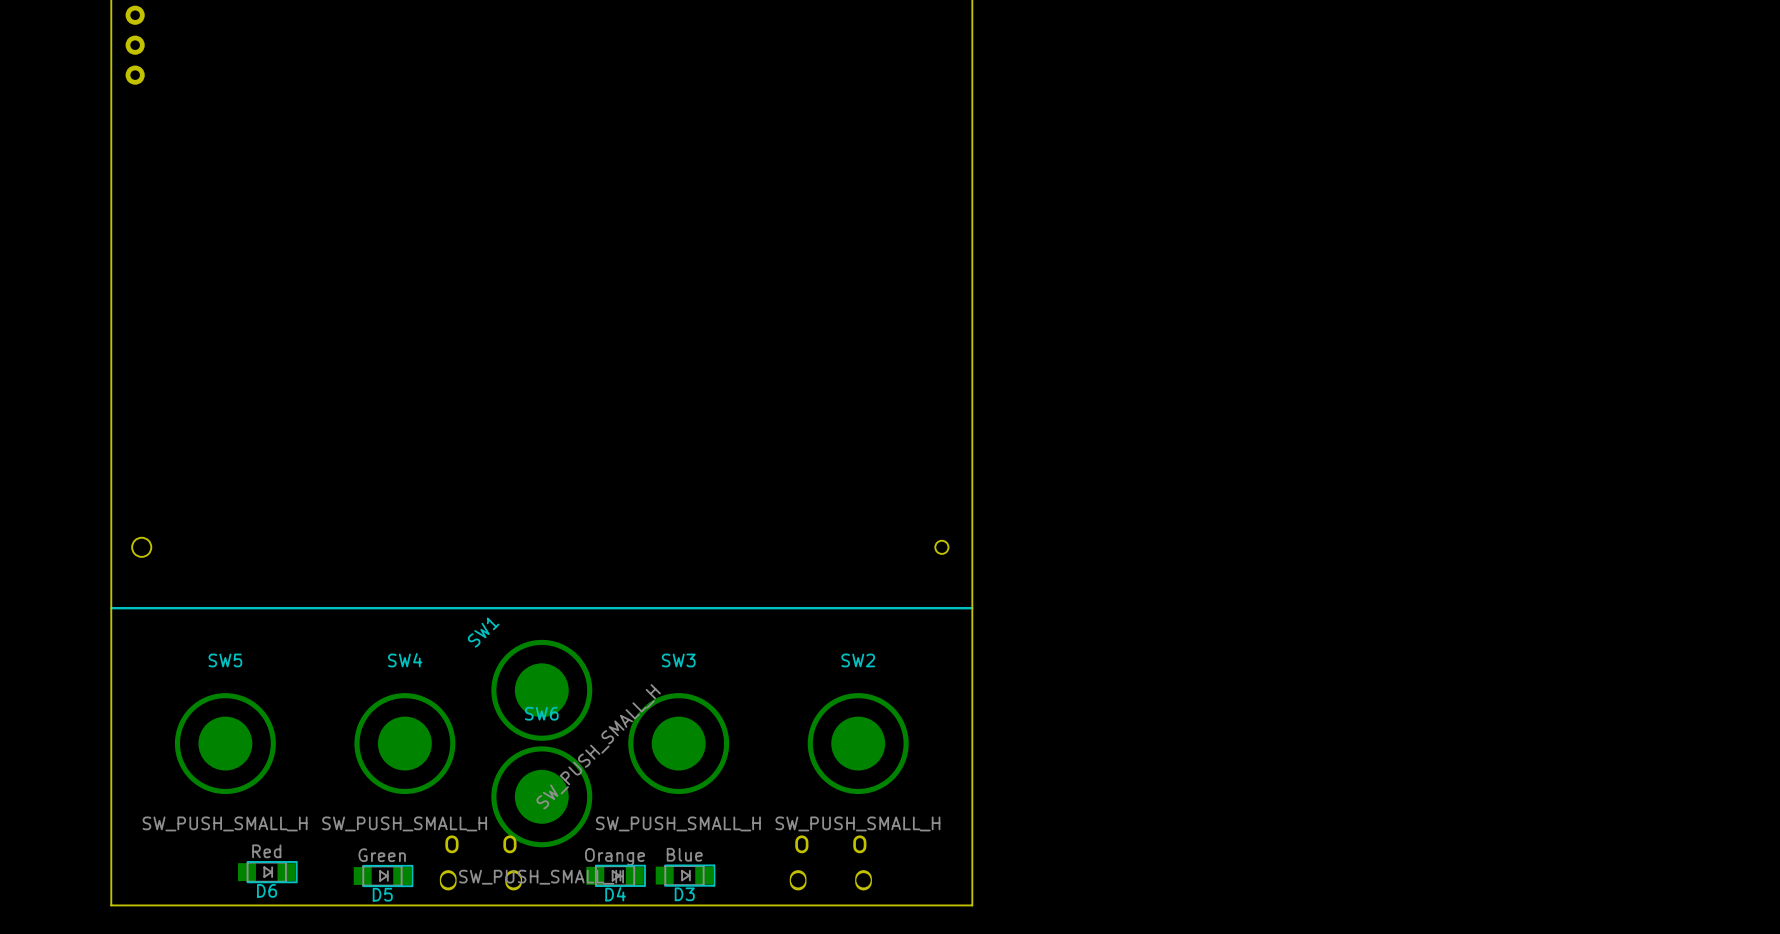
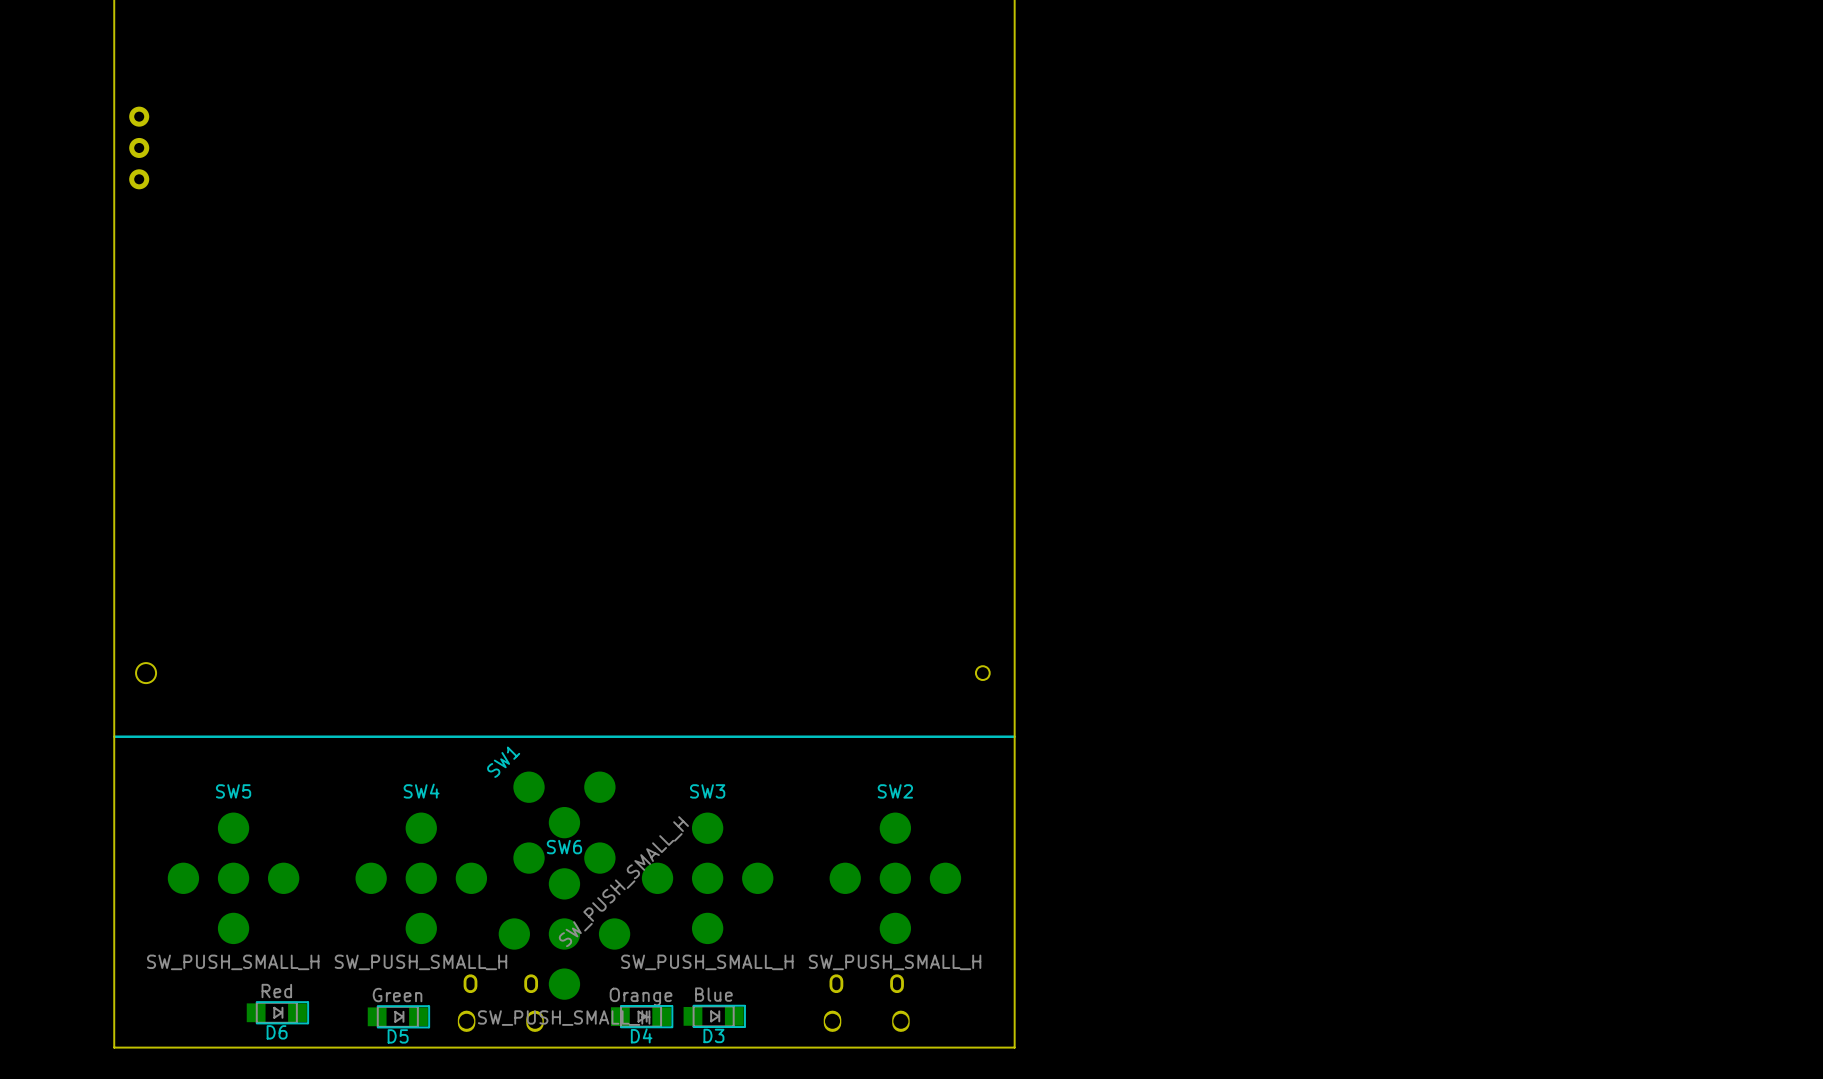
SW1 footprint: [491, 639, 593, 741] -> [513, 771, 616, 874]
SW5 footprint: [174, 693, 276, 795] -> [167, 812, 300, 945]
SW4 footprint: [354, 693, 456, 795] -> [355, 812, 488, 945]
SW3 footprint: [628, 693, 730, 795] -> [641, 812, 774, 945]
SW2 footprint: [807, 693, 909, 795] -> [829, 812, 962, 945]
SW6 footprint: [491, 746, 593, 848] -> [498, 868, 631, 1000]

